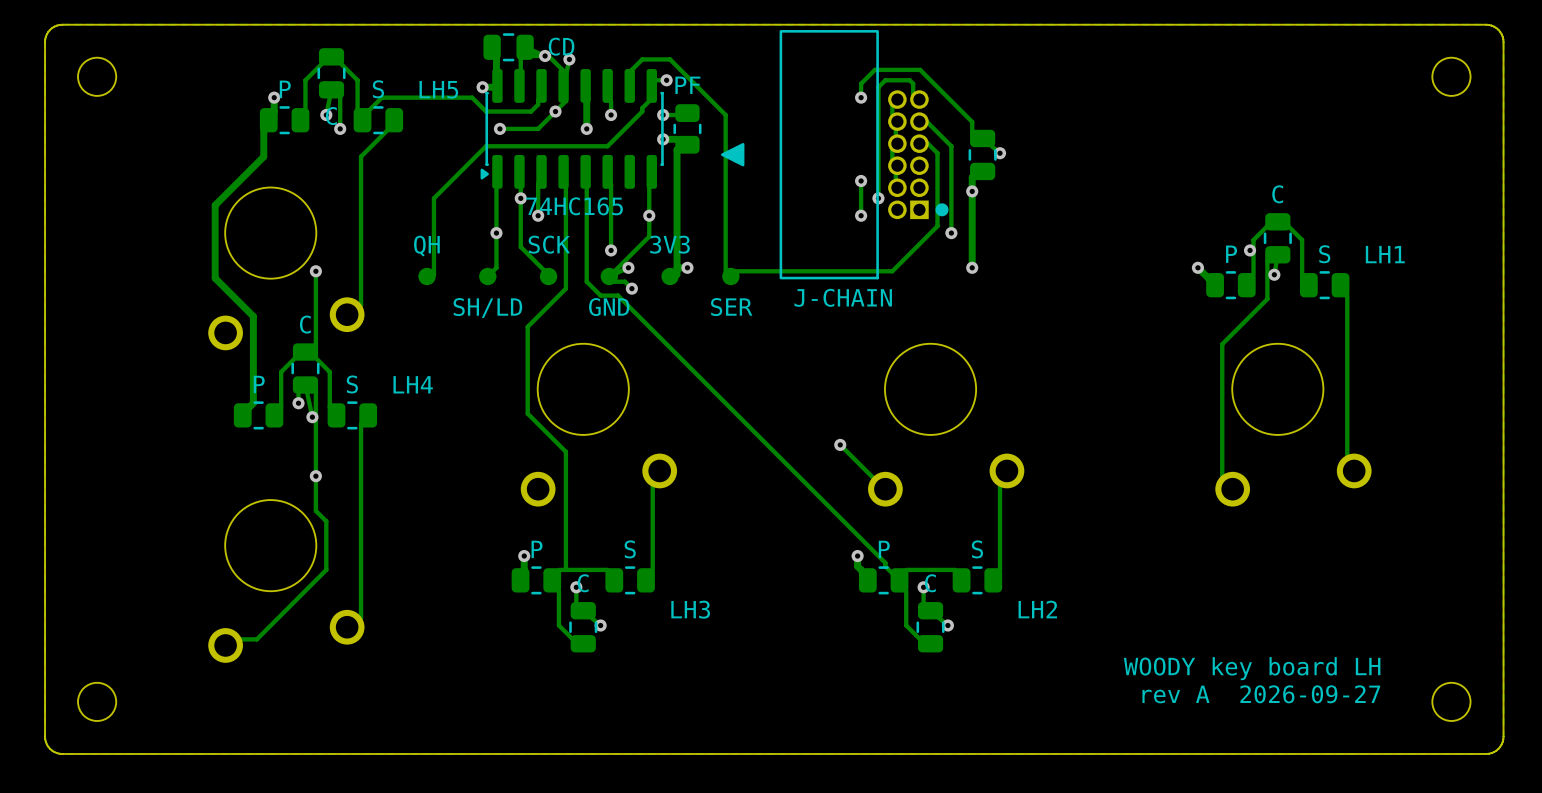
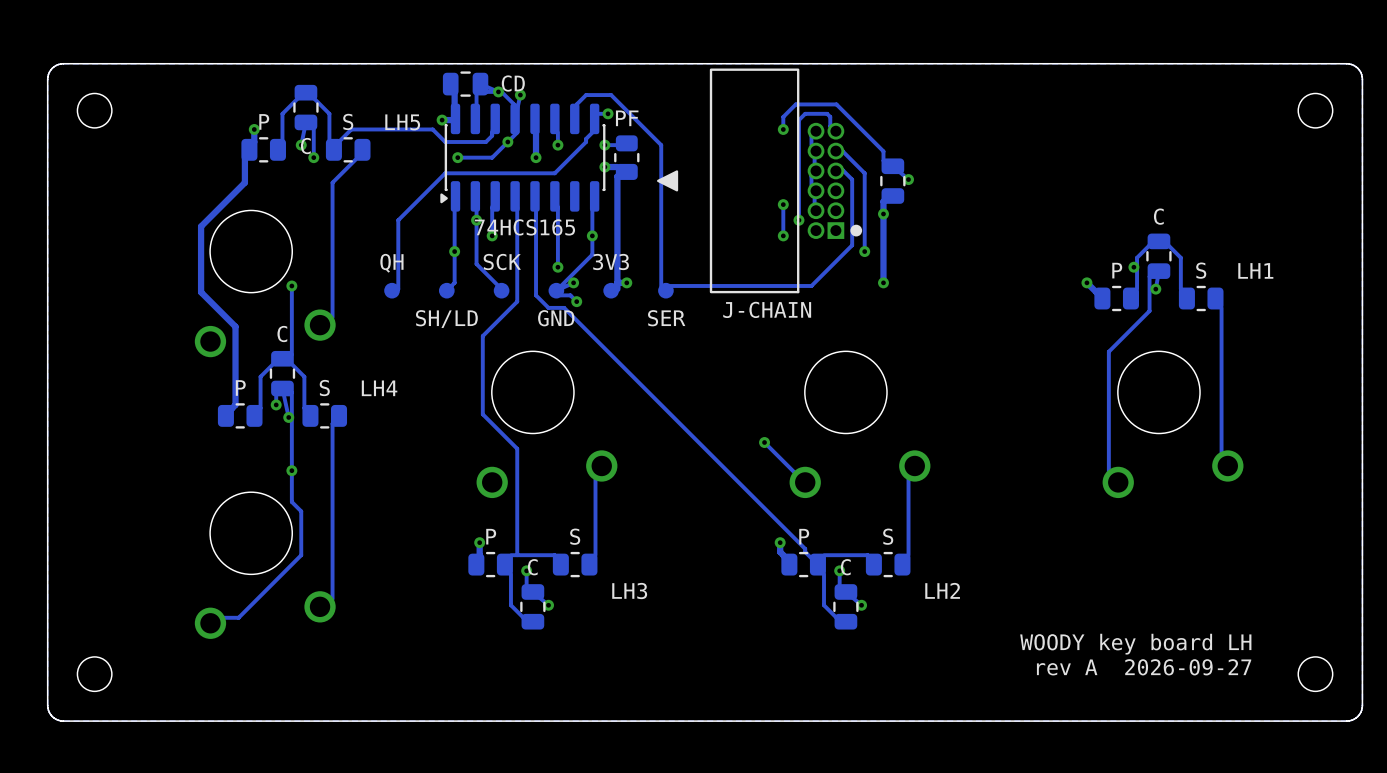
text: 74HC165 (574, 206) -> 74HCS165 (524, 227)

